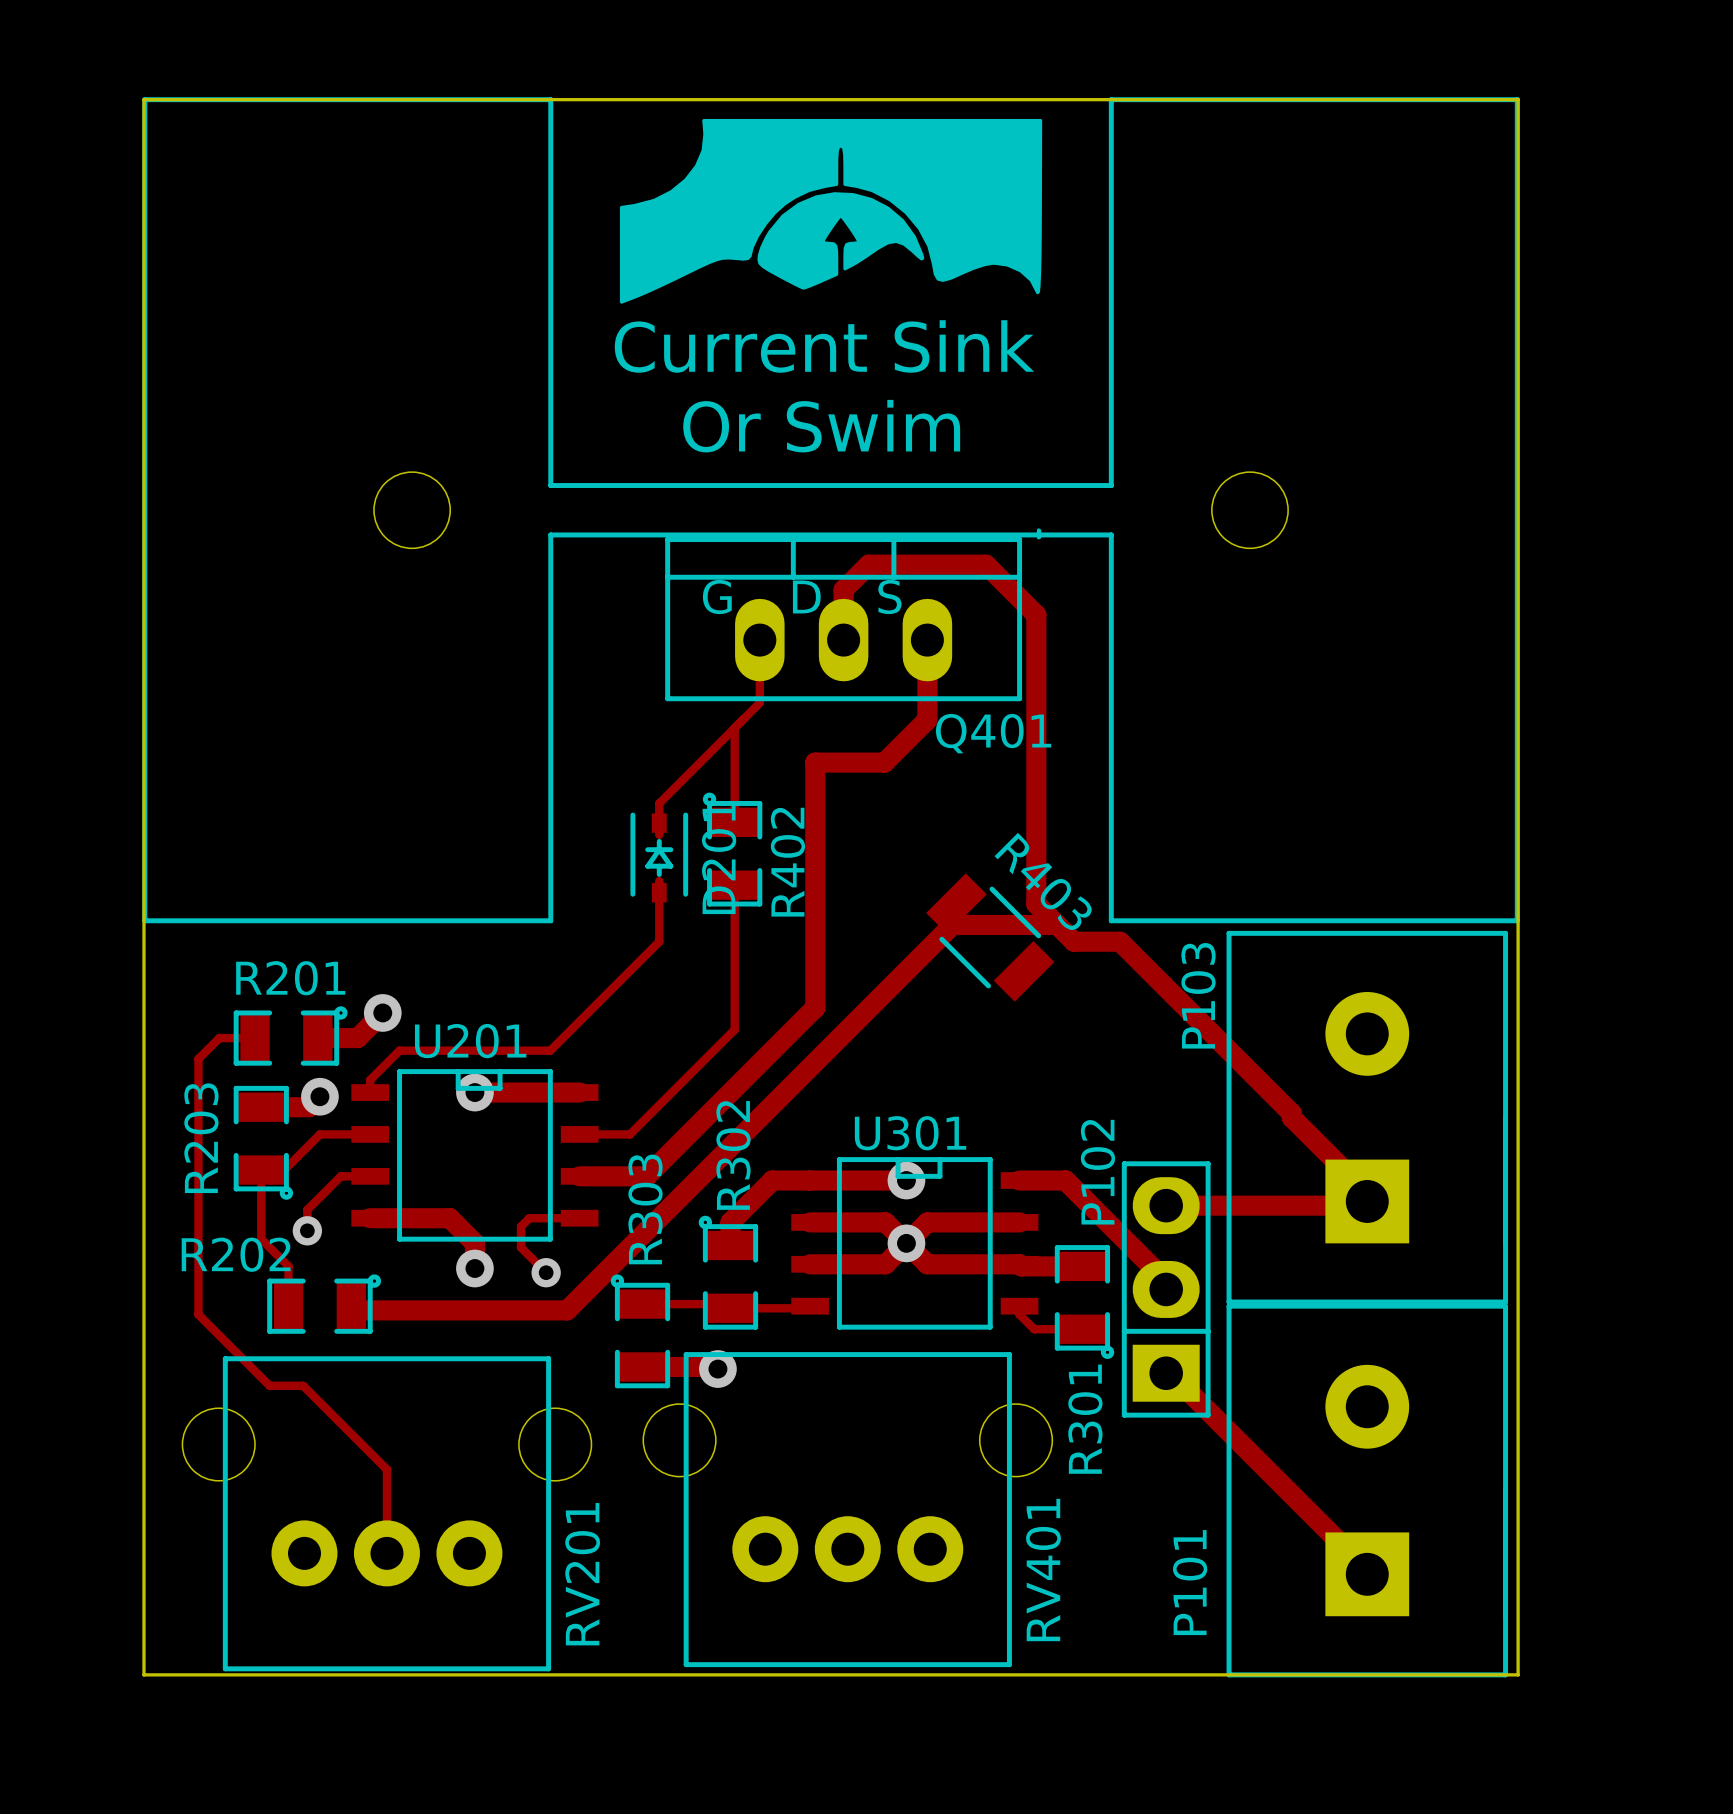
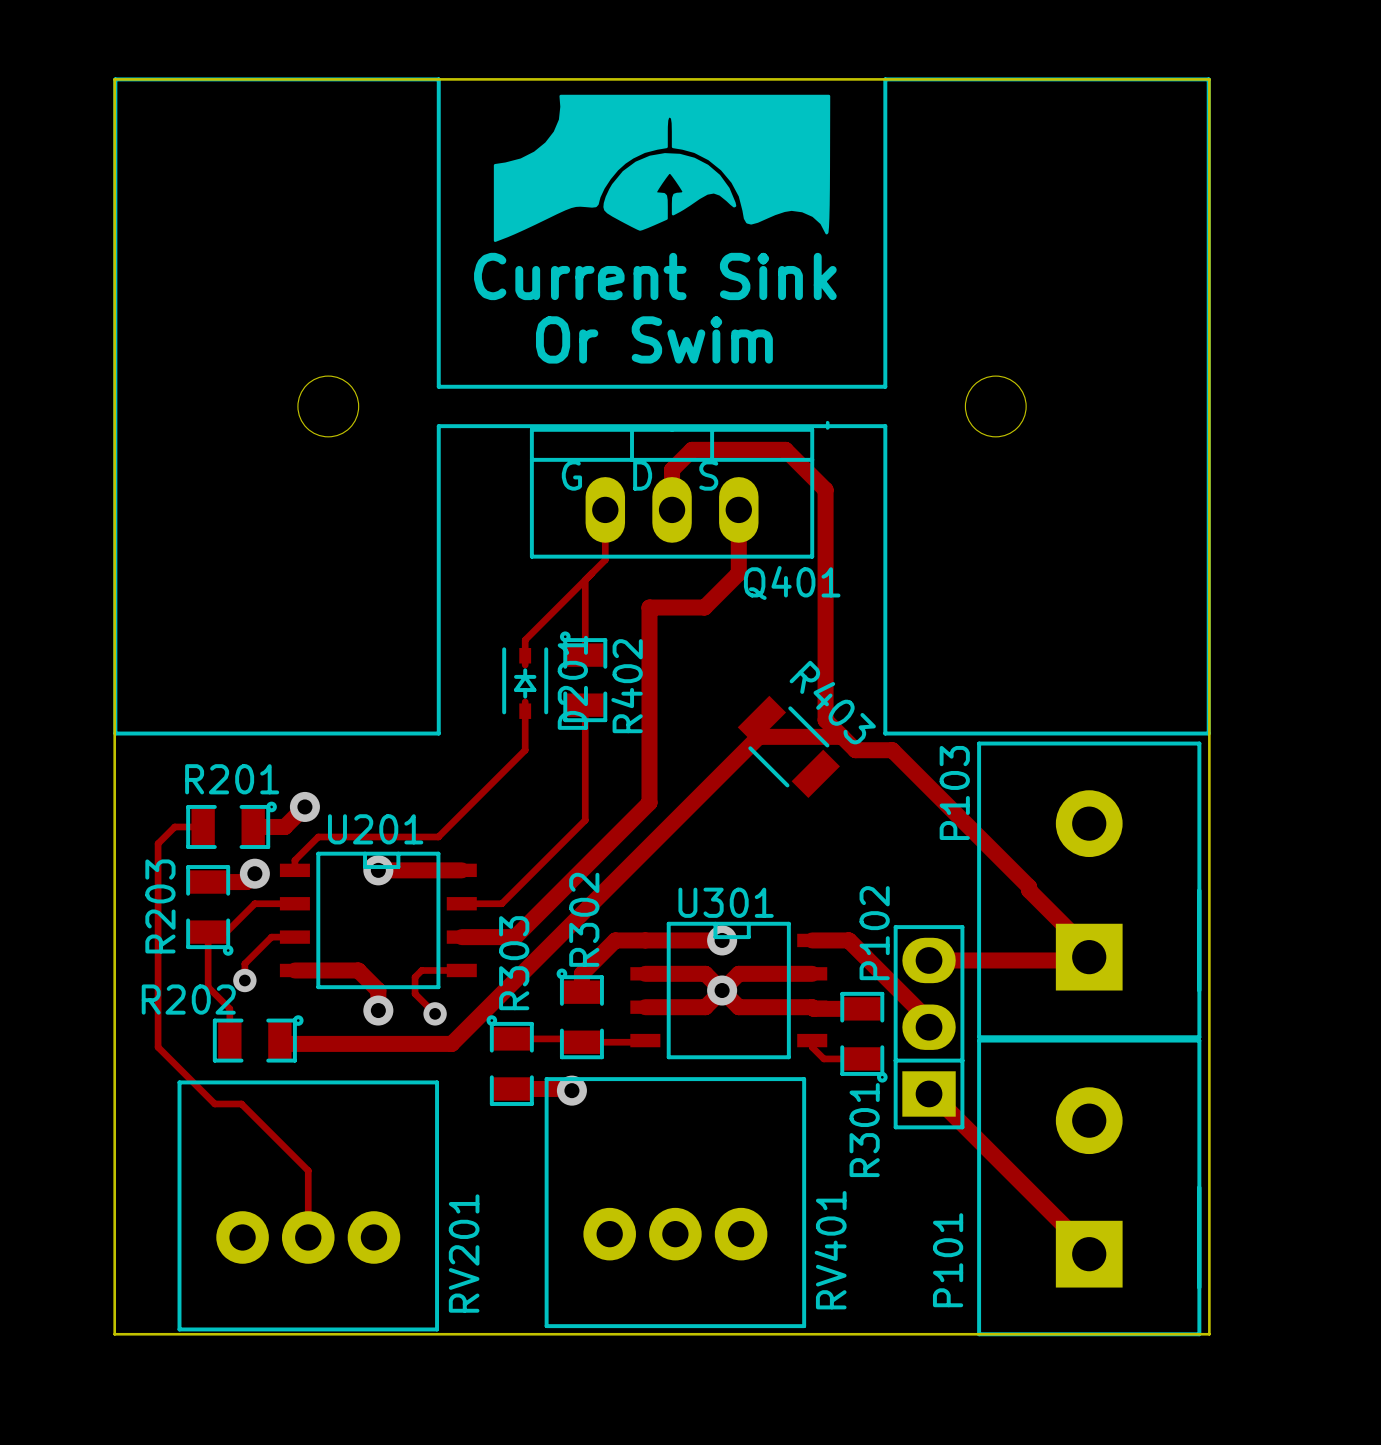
RV401 footprint: [643, 1352, 1053, 1668] -> [515, 1077, 836, 1329]
RV201 footprint: [182, 1356, 592, 1672] -> [147, 1080, 469, 1332]

